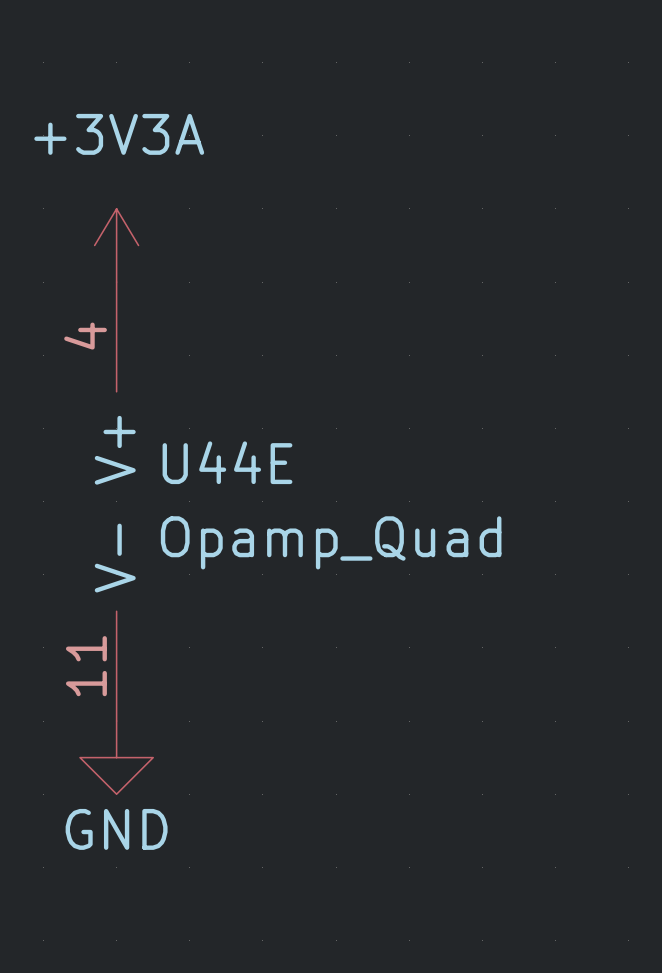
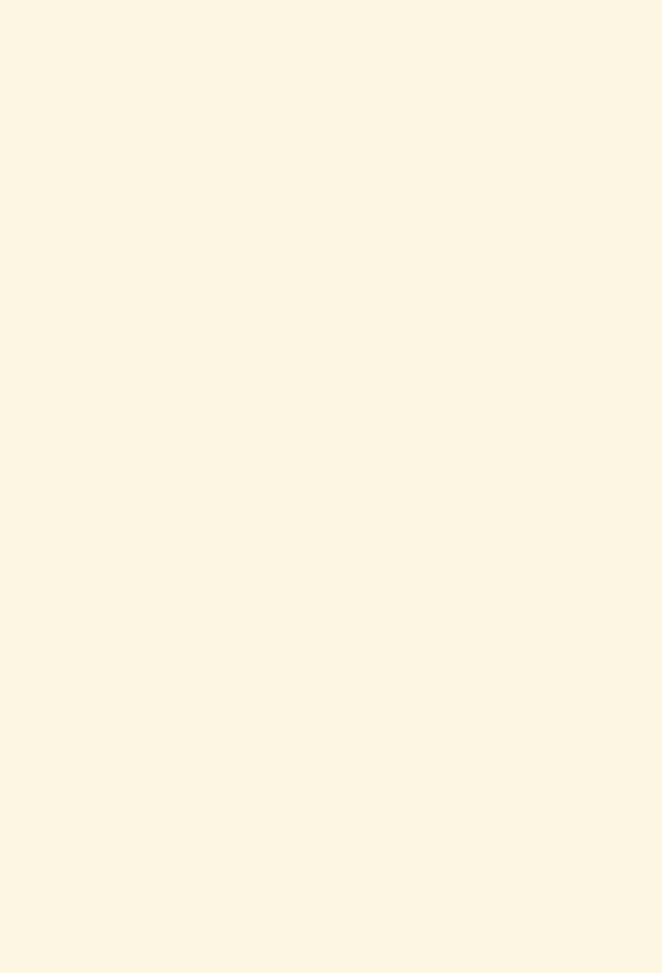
power symbol: +3V3A (116, 245) -> none
U44E: Opamp_Quad (116, 501) -> none
power symbol: GND (116, 757) -> none

